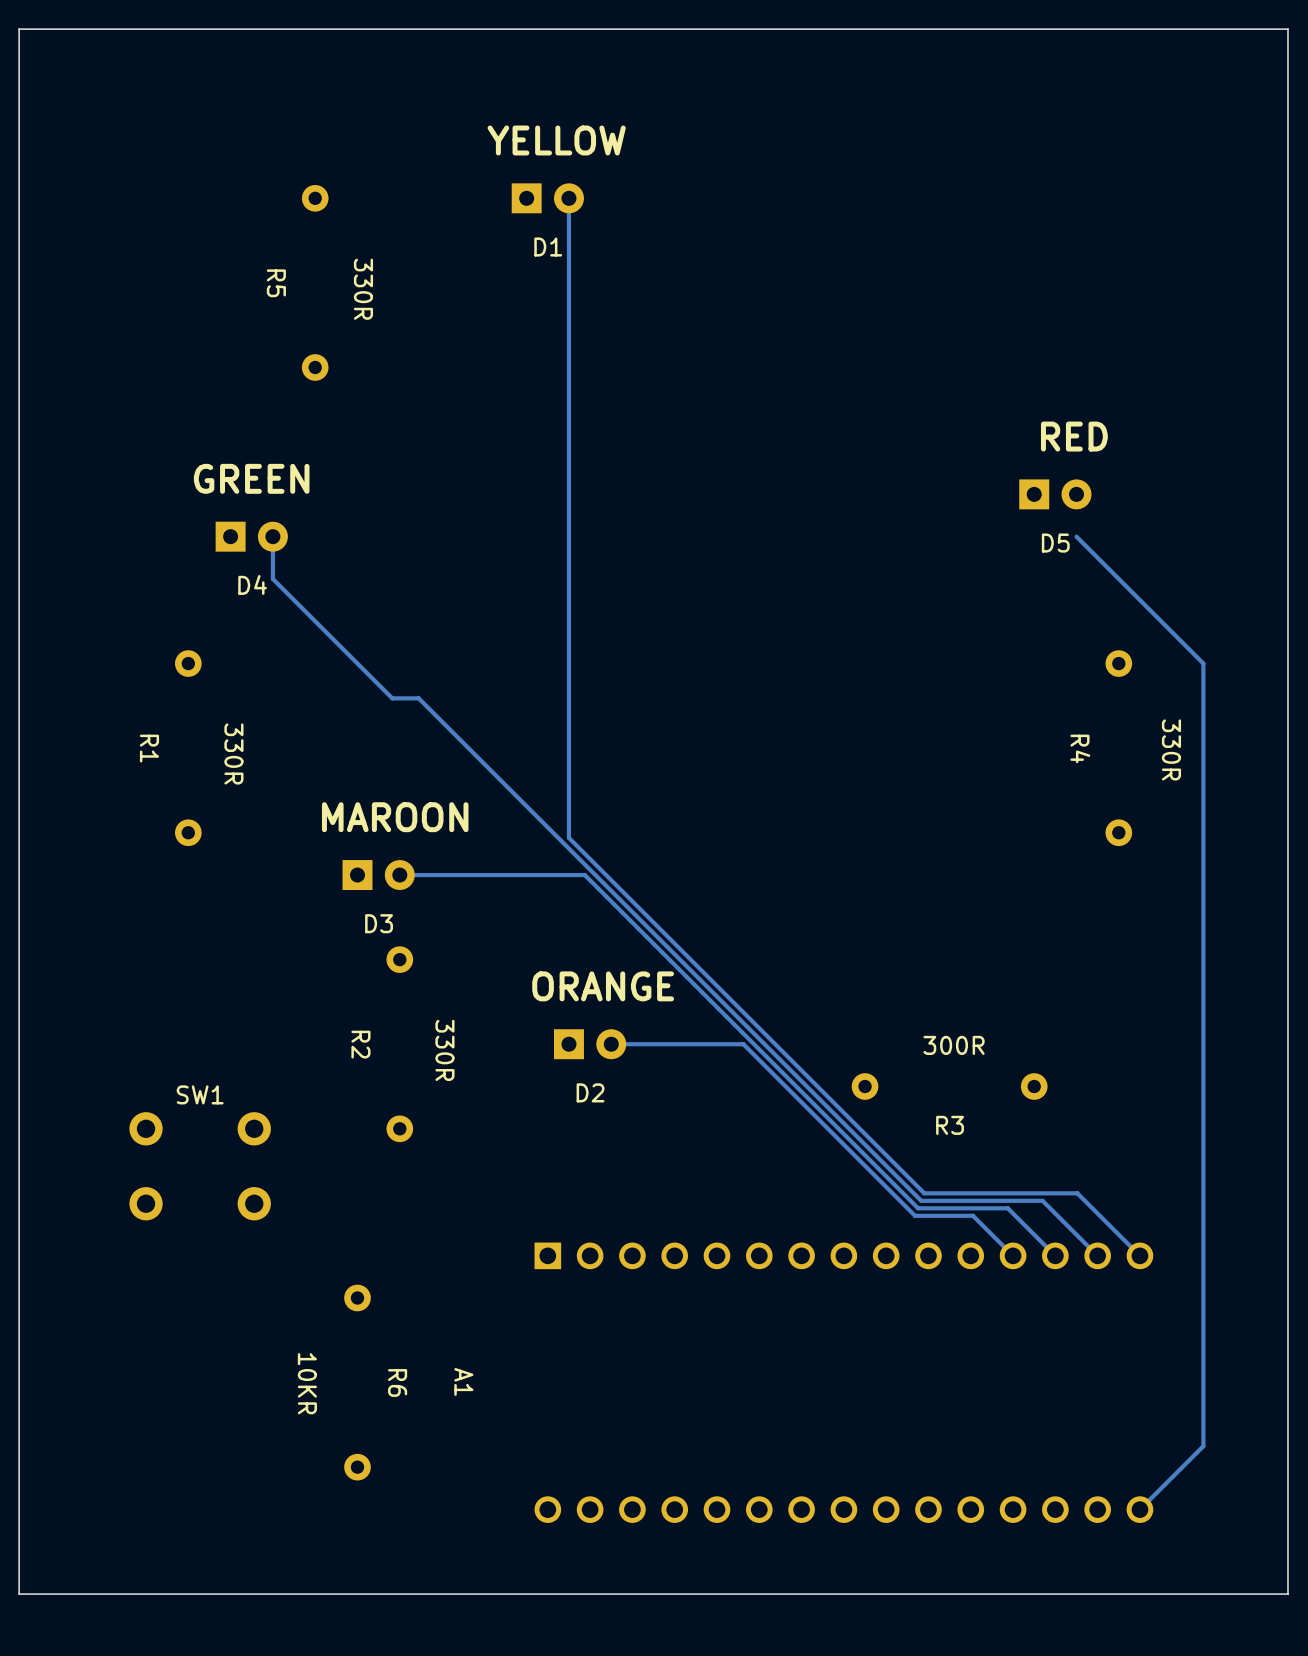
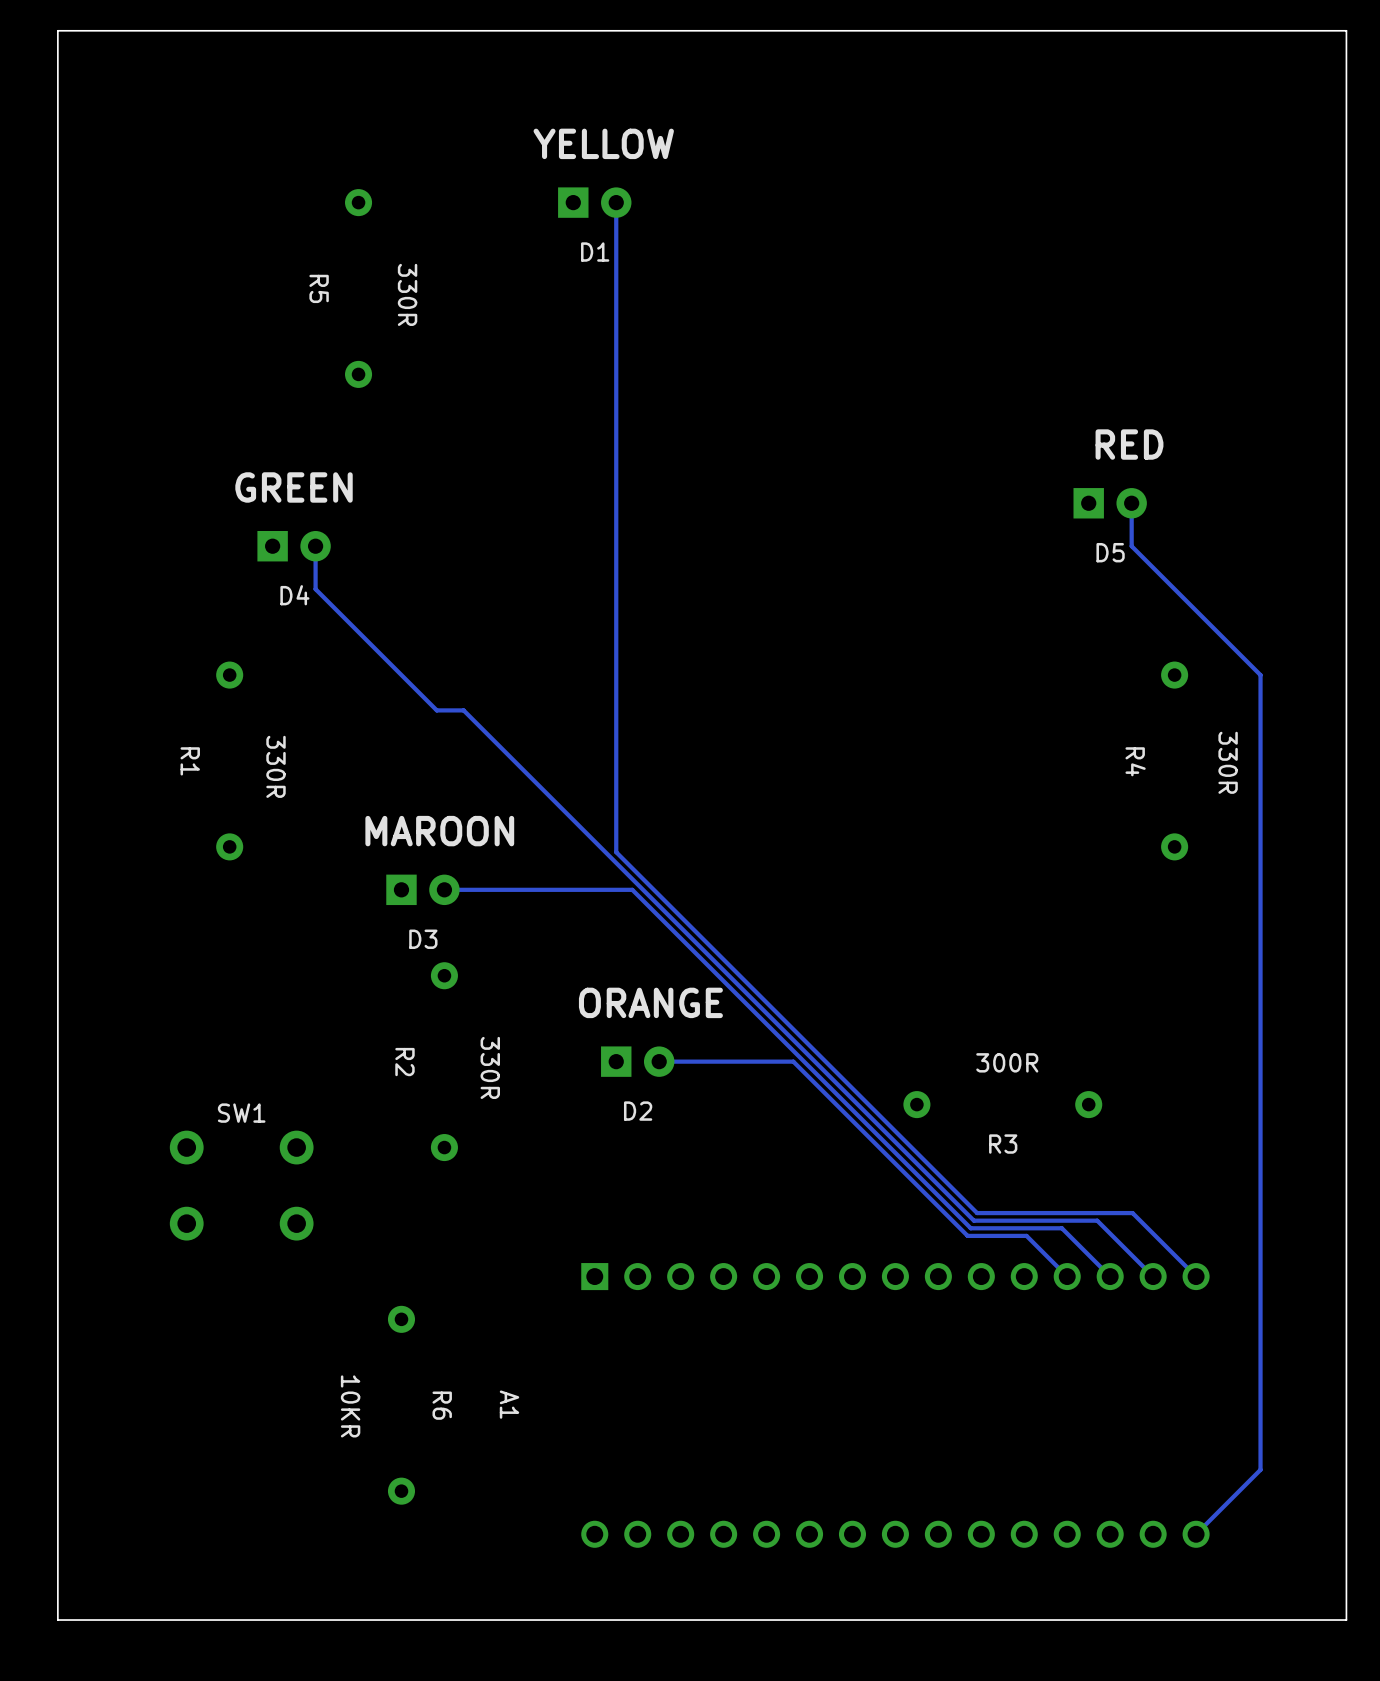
track: none -> (1131, 503) (1131, 546)

